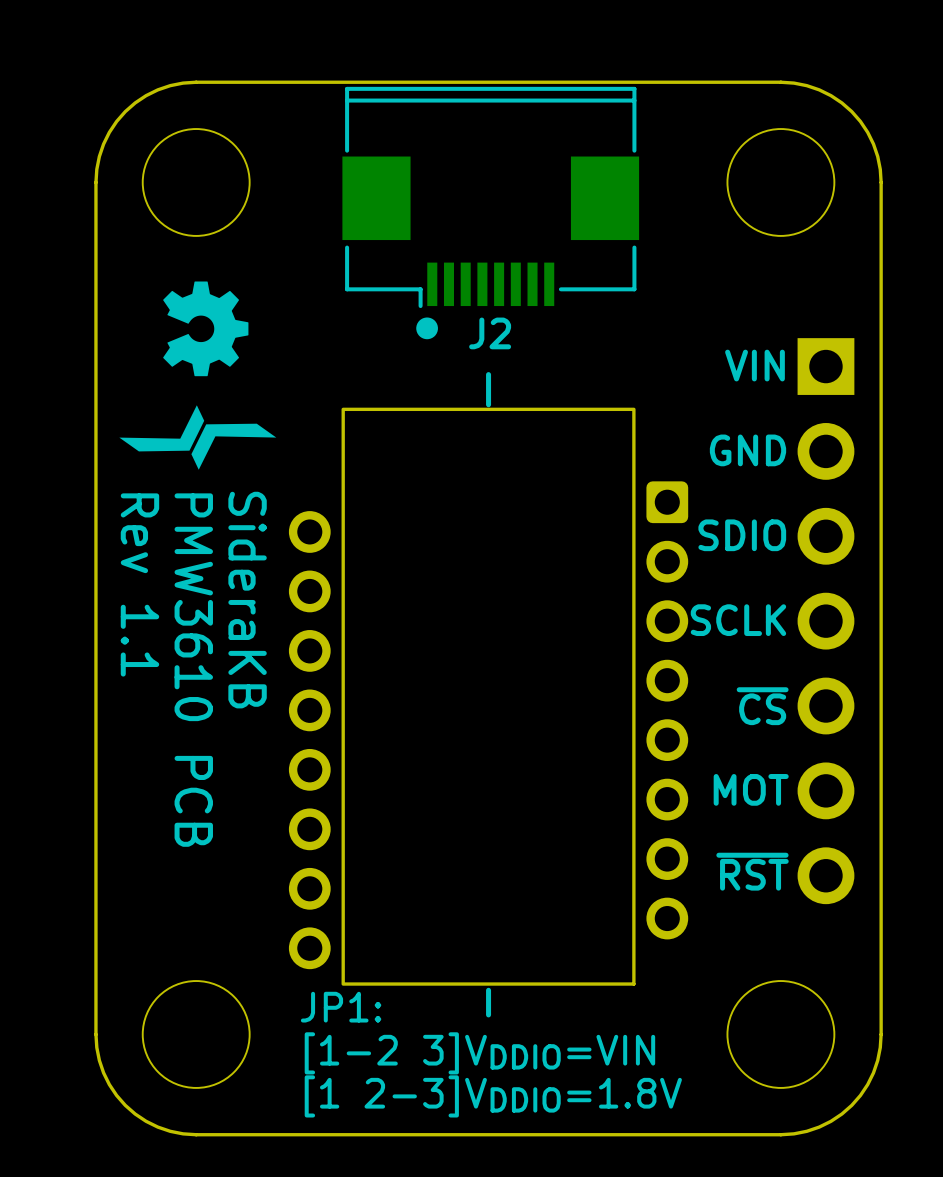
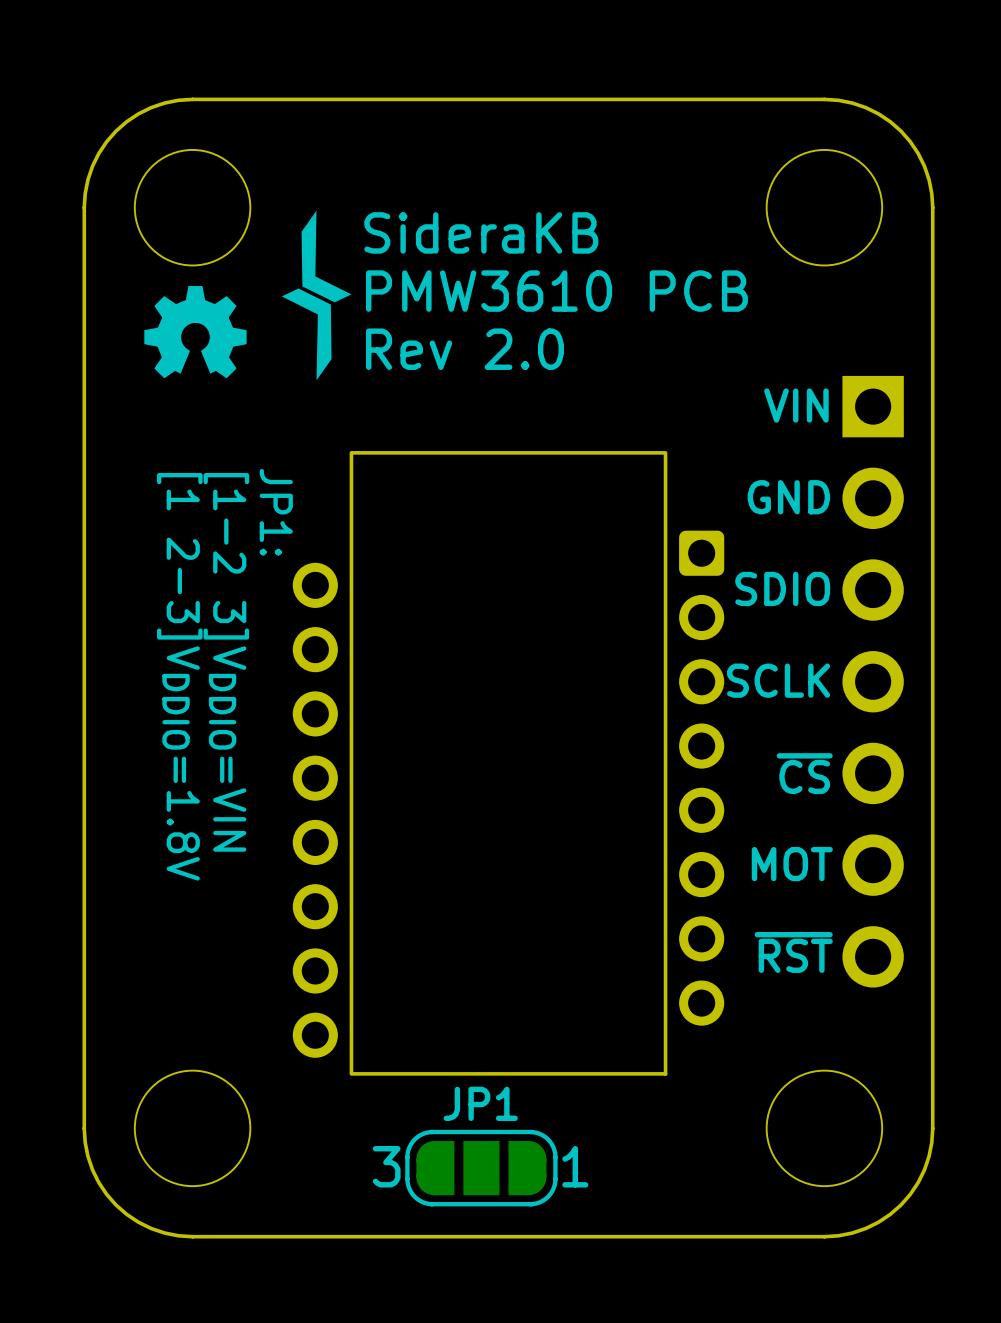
drawing: none -> [281, 210, 352, 381]
J2: (490, 197) -> none
drawing shape: [163, 281, 249, 377] -> [144, 286, 247, 379]
text: none -> Rev 2.0 (464, 349)
drawing: [416, 317, 438, 340] -> none
line: (488, 374) (488, 404) -> none
drawing: [119, 405, 277, 470] -> none
text: Rev 1.1 (139, 584) -> none
text rotation: 0° (247, 600) -> 90° counterclockwise (481, 232)
text position: SideraKB (247, 600) -> SideraKB (481, 232)
text rotation: 0° (193, 670) -> 90° counterclockwise (556, 291)
text position: PMW3610 PCB (193, 670) -> PMW3610 PCB (556, 291)
line: (488, 990) (488, 1014) -> none
text rotation: 0° (341, 1007) -> 90° clockwise (276, 512)
text position: JP1: (341, 1007) -> JP1: (276, 512)
text rotation: 0° (479, 1053) -> 90° clockwise (226, 662)
JP1: none -> (481, 1168)
text rotation: 0° (493, 1096) -> 90° clockwise (179, 676)
text position: [1 2-3]VDDIO=1.8V (493, 1096) -> [1 2-3]VDDIO=1.8V (179, 676)

